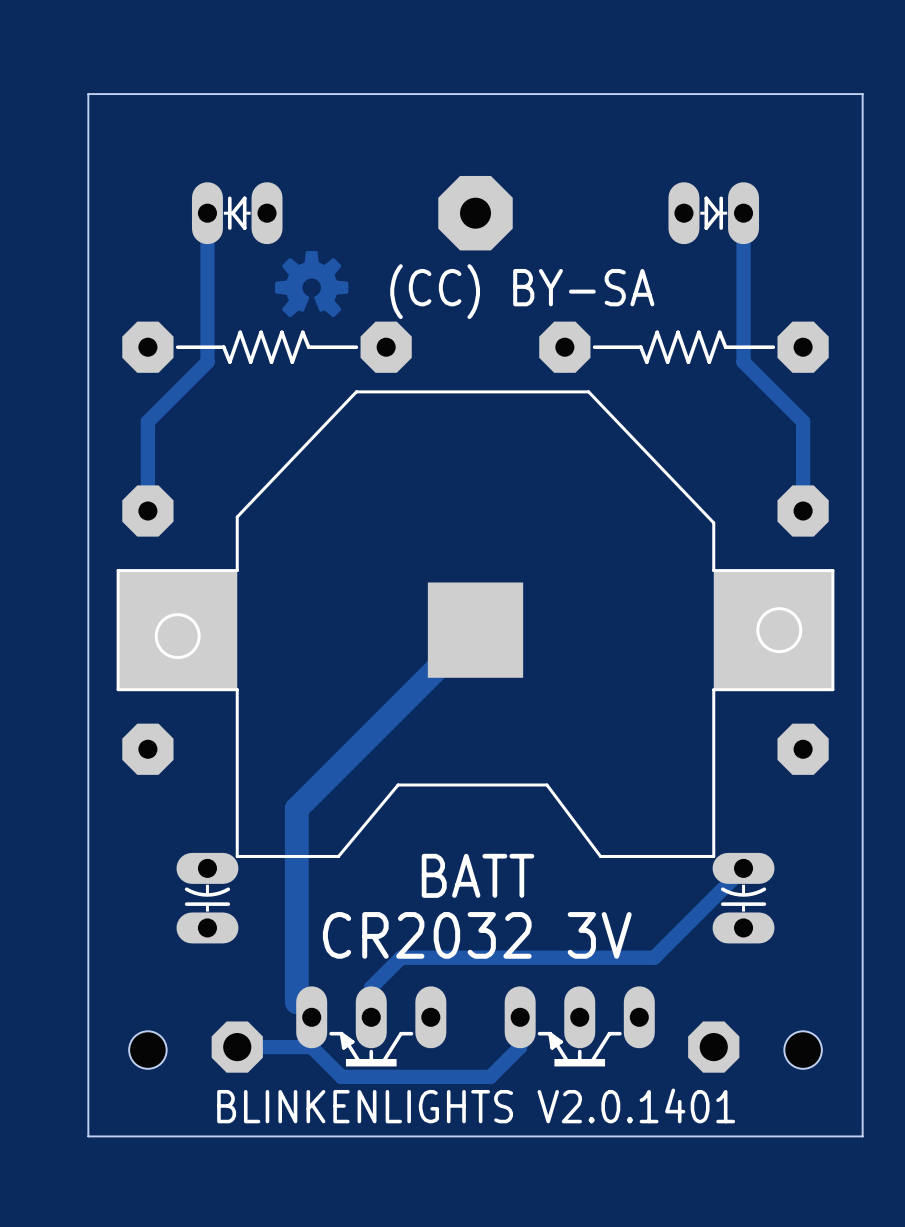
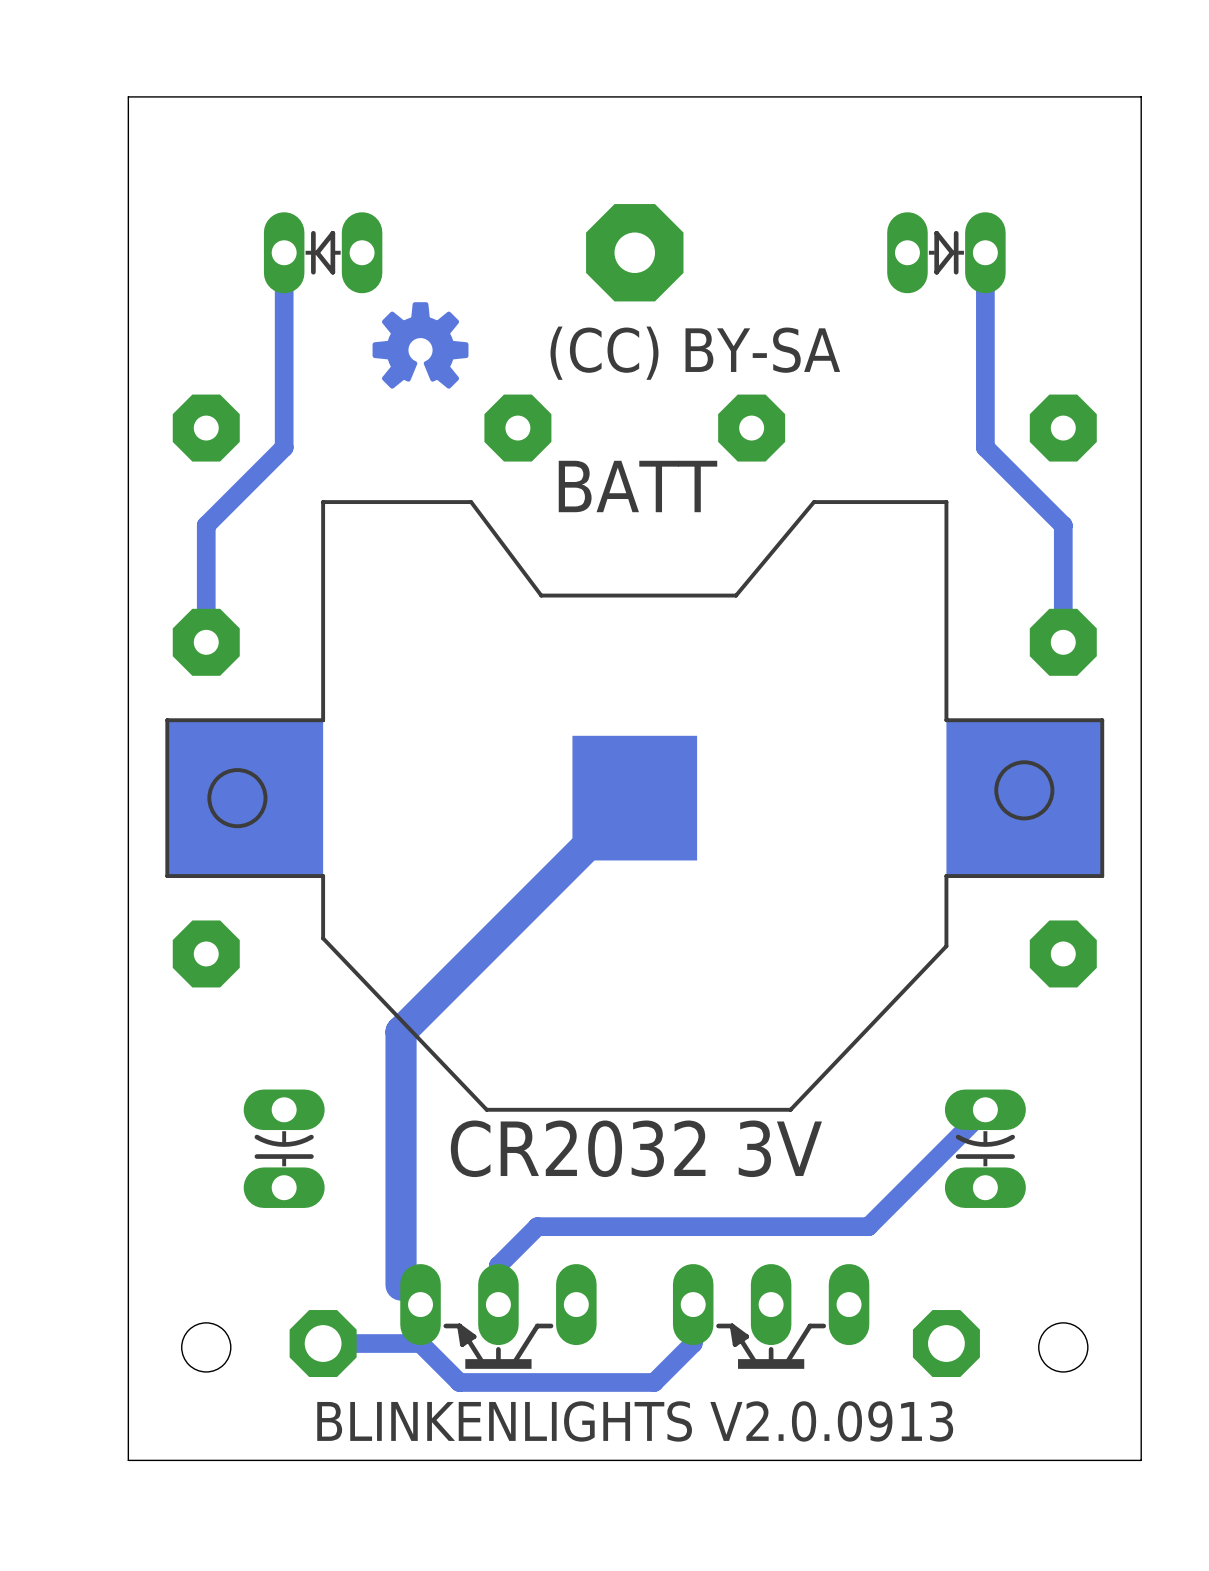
line: (356, 347) (308, 347) (302, 332) (292, 362) (281, 332) (271, 362) (261, 332) (250, 362) (240, 332) (229, 362) (223, 347) (177, 347) -> none
line: (773, 347) (725, 347) (719, 332) (709, 362) (698, 332) (688, 362) (678, 332) (667, 362) (657, 332) (646, 362) (640, 347) (594, 347) -> none
BATT rotation: 0° (475, 624) -> 180° (634, 805)
text position: CR2032 3V (477, 935) -> CR2032 3V (636, 1148)
text: BLINKENLIGHTS V2.0.1401 (476, 1105) -> BLINKENLIGHTS V2.0.0913 (635, 1421)

